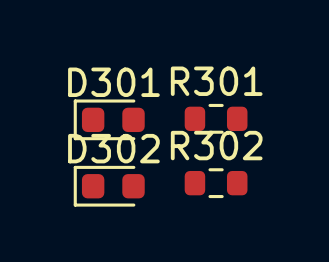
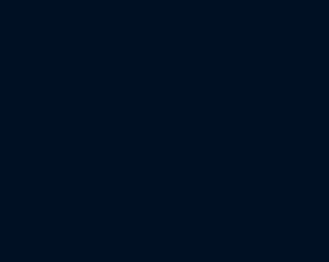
R301: (216, 118) -> none
D301: (109, 119) -> none
R302: (216, 183) -> none
D302: (109, 186) -> none

